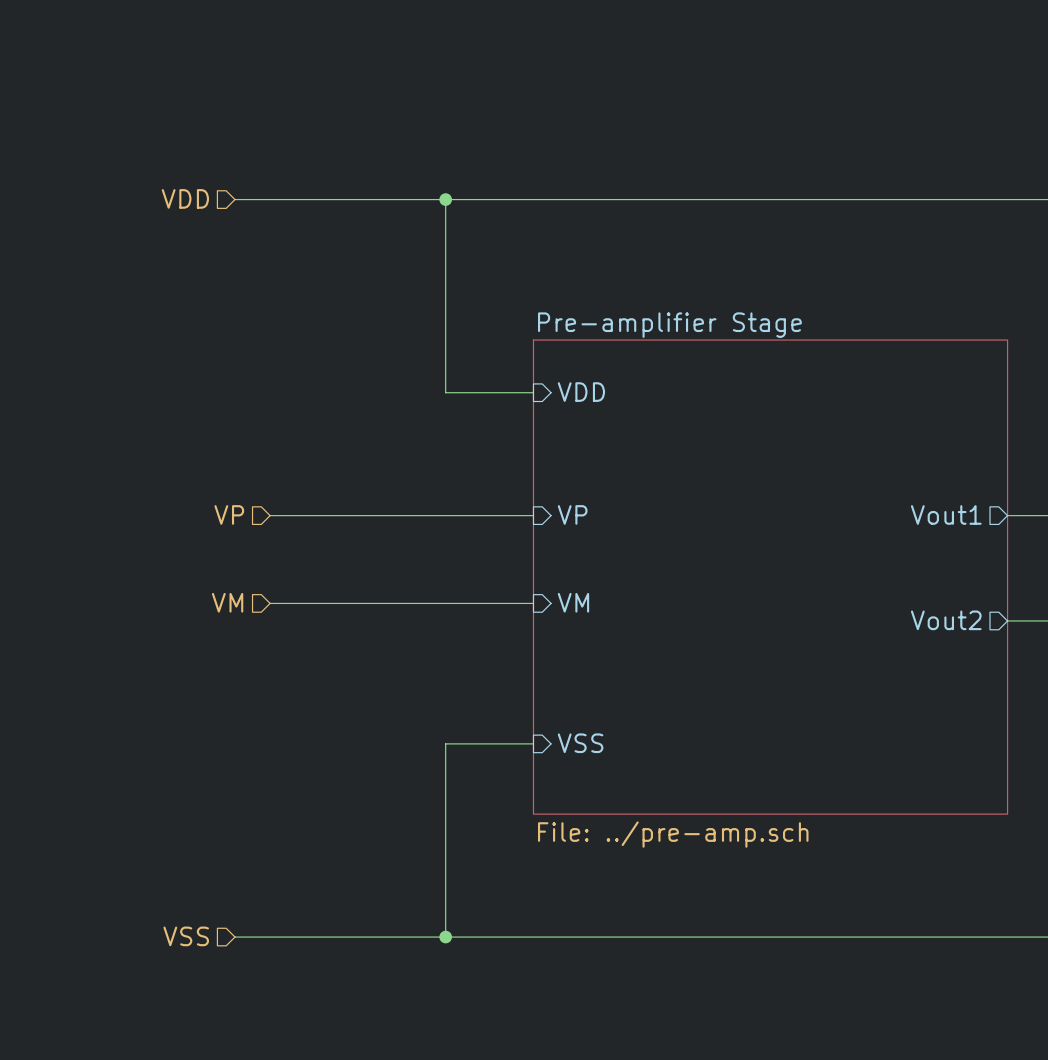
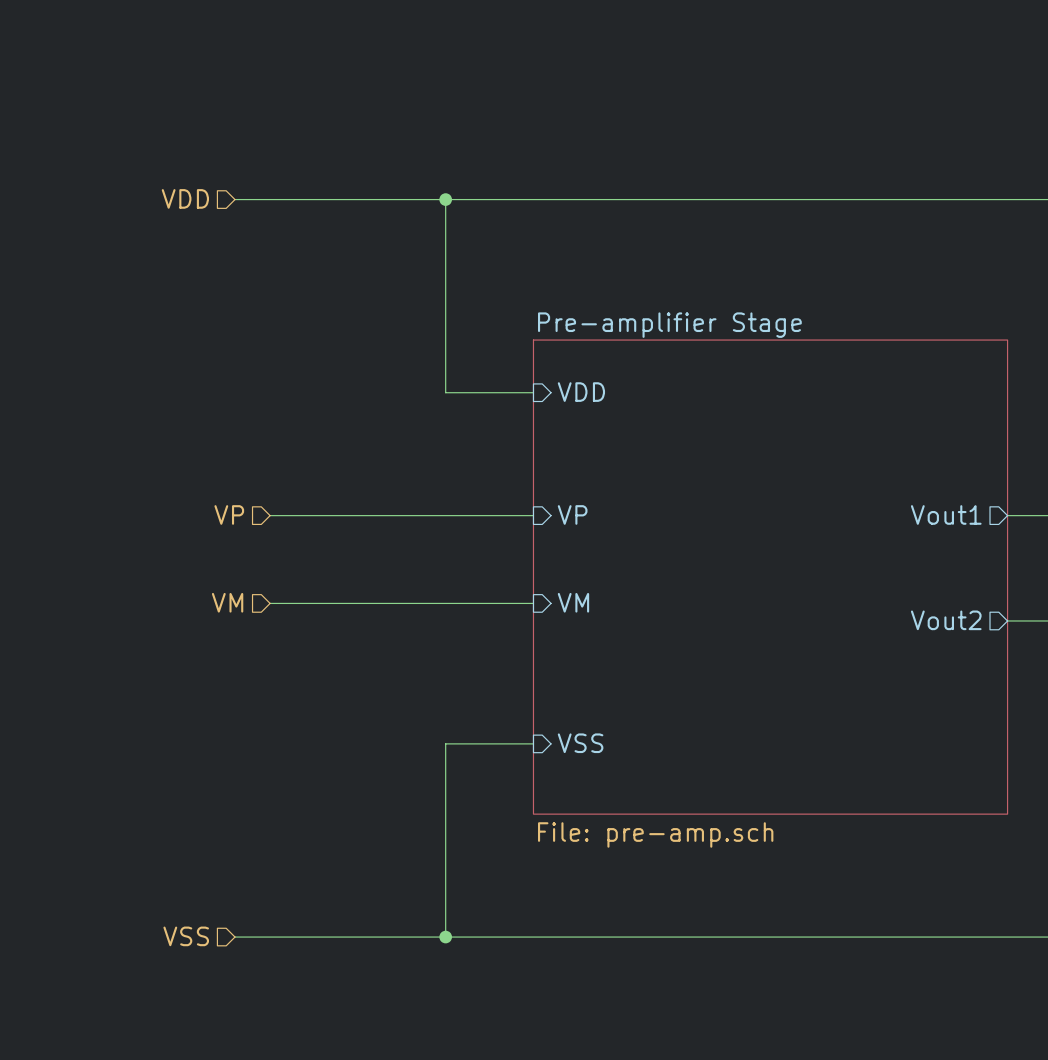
sheet Pre-amplifier Stage value: File: ../pre-amp.sch (673, 834) -> File: pre-amp.sch (655, 834)

